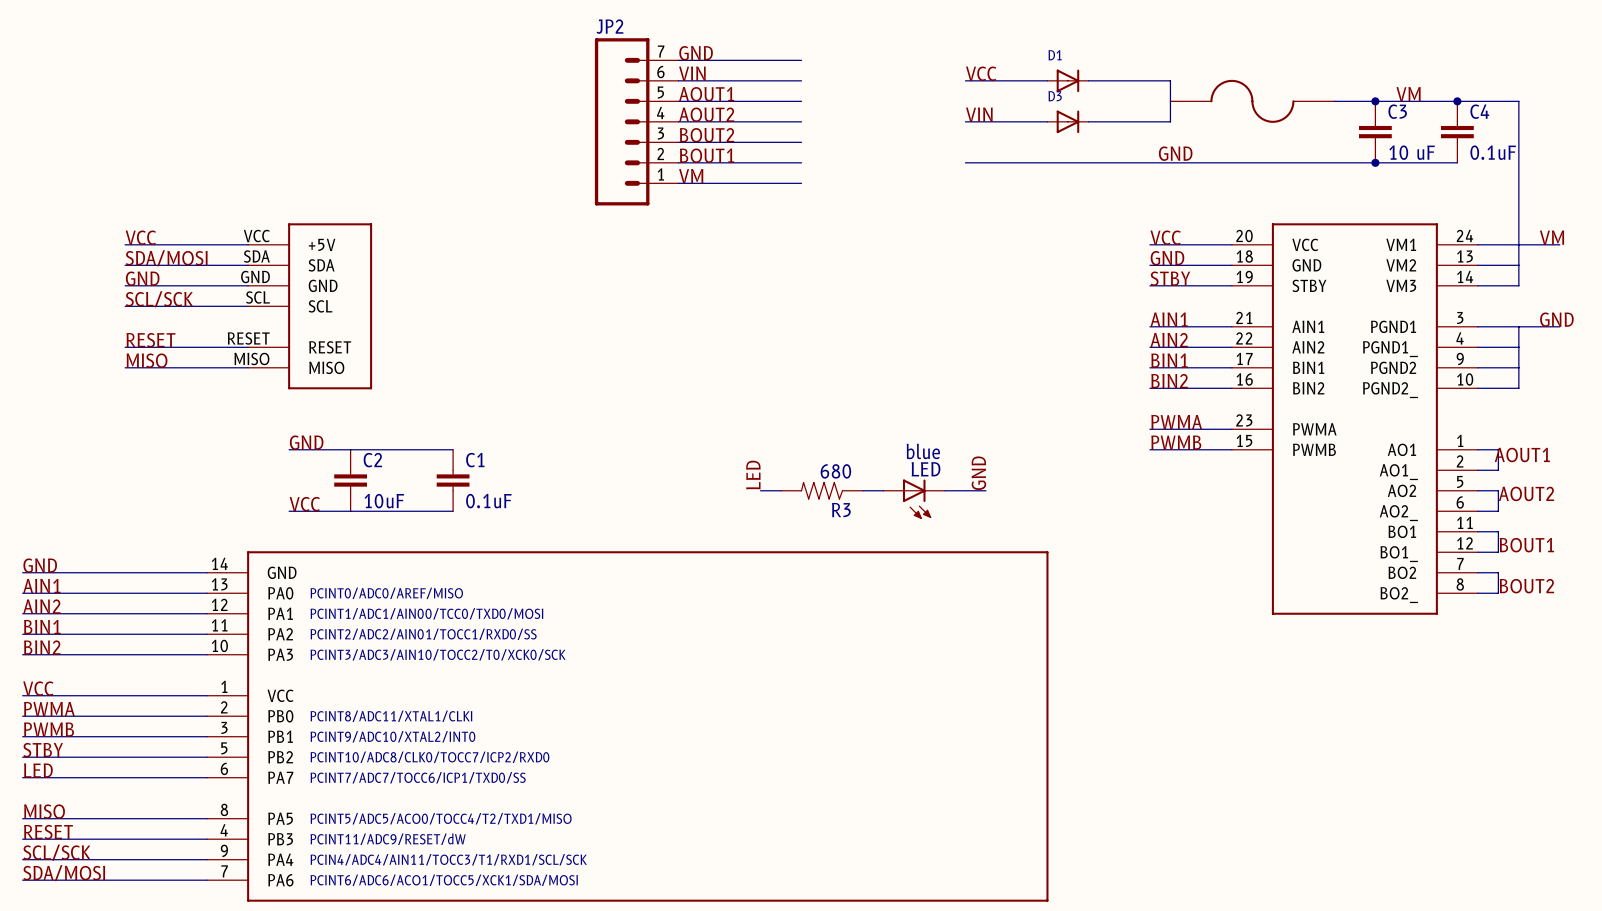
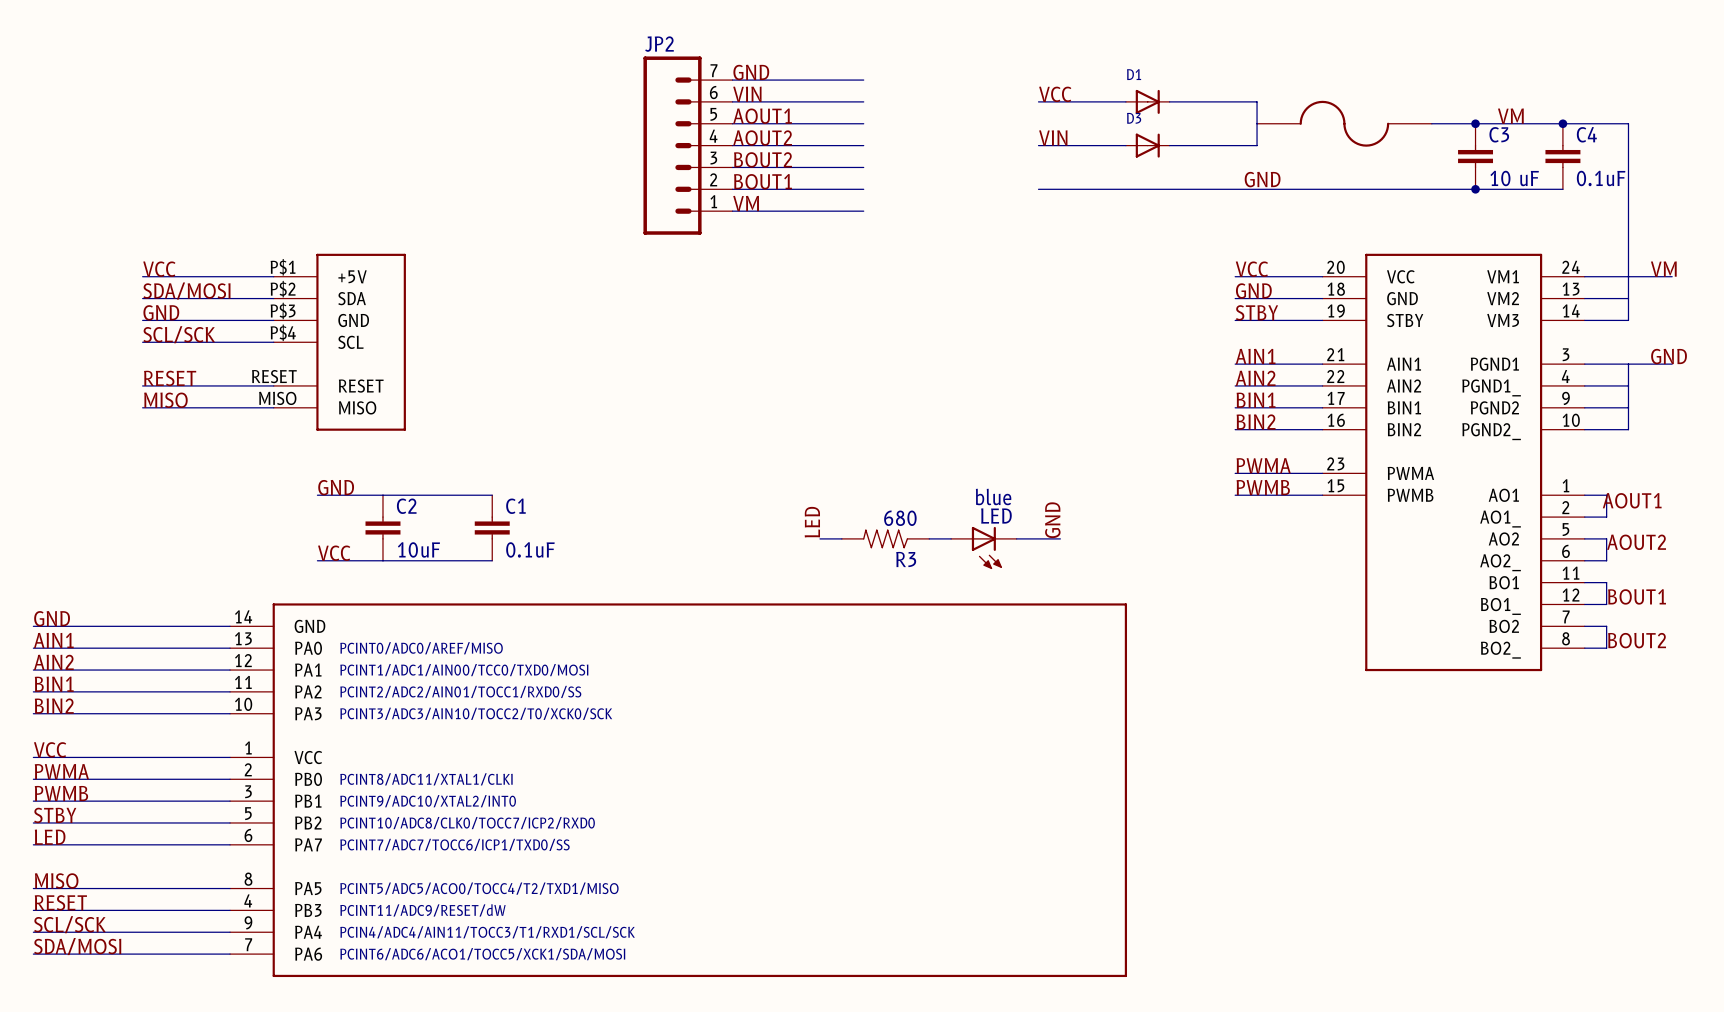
part pin number: VCC (256, 236) -> P$1 (283, 267)
part pin number: SDA (256, 256) -> P$2 (283, 289)
part pin number: GND (255, 277) -> P$3 (283, 310)
part pin number: SCL (258, 297) -> P$4 (283, 332)

